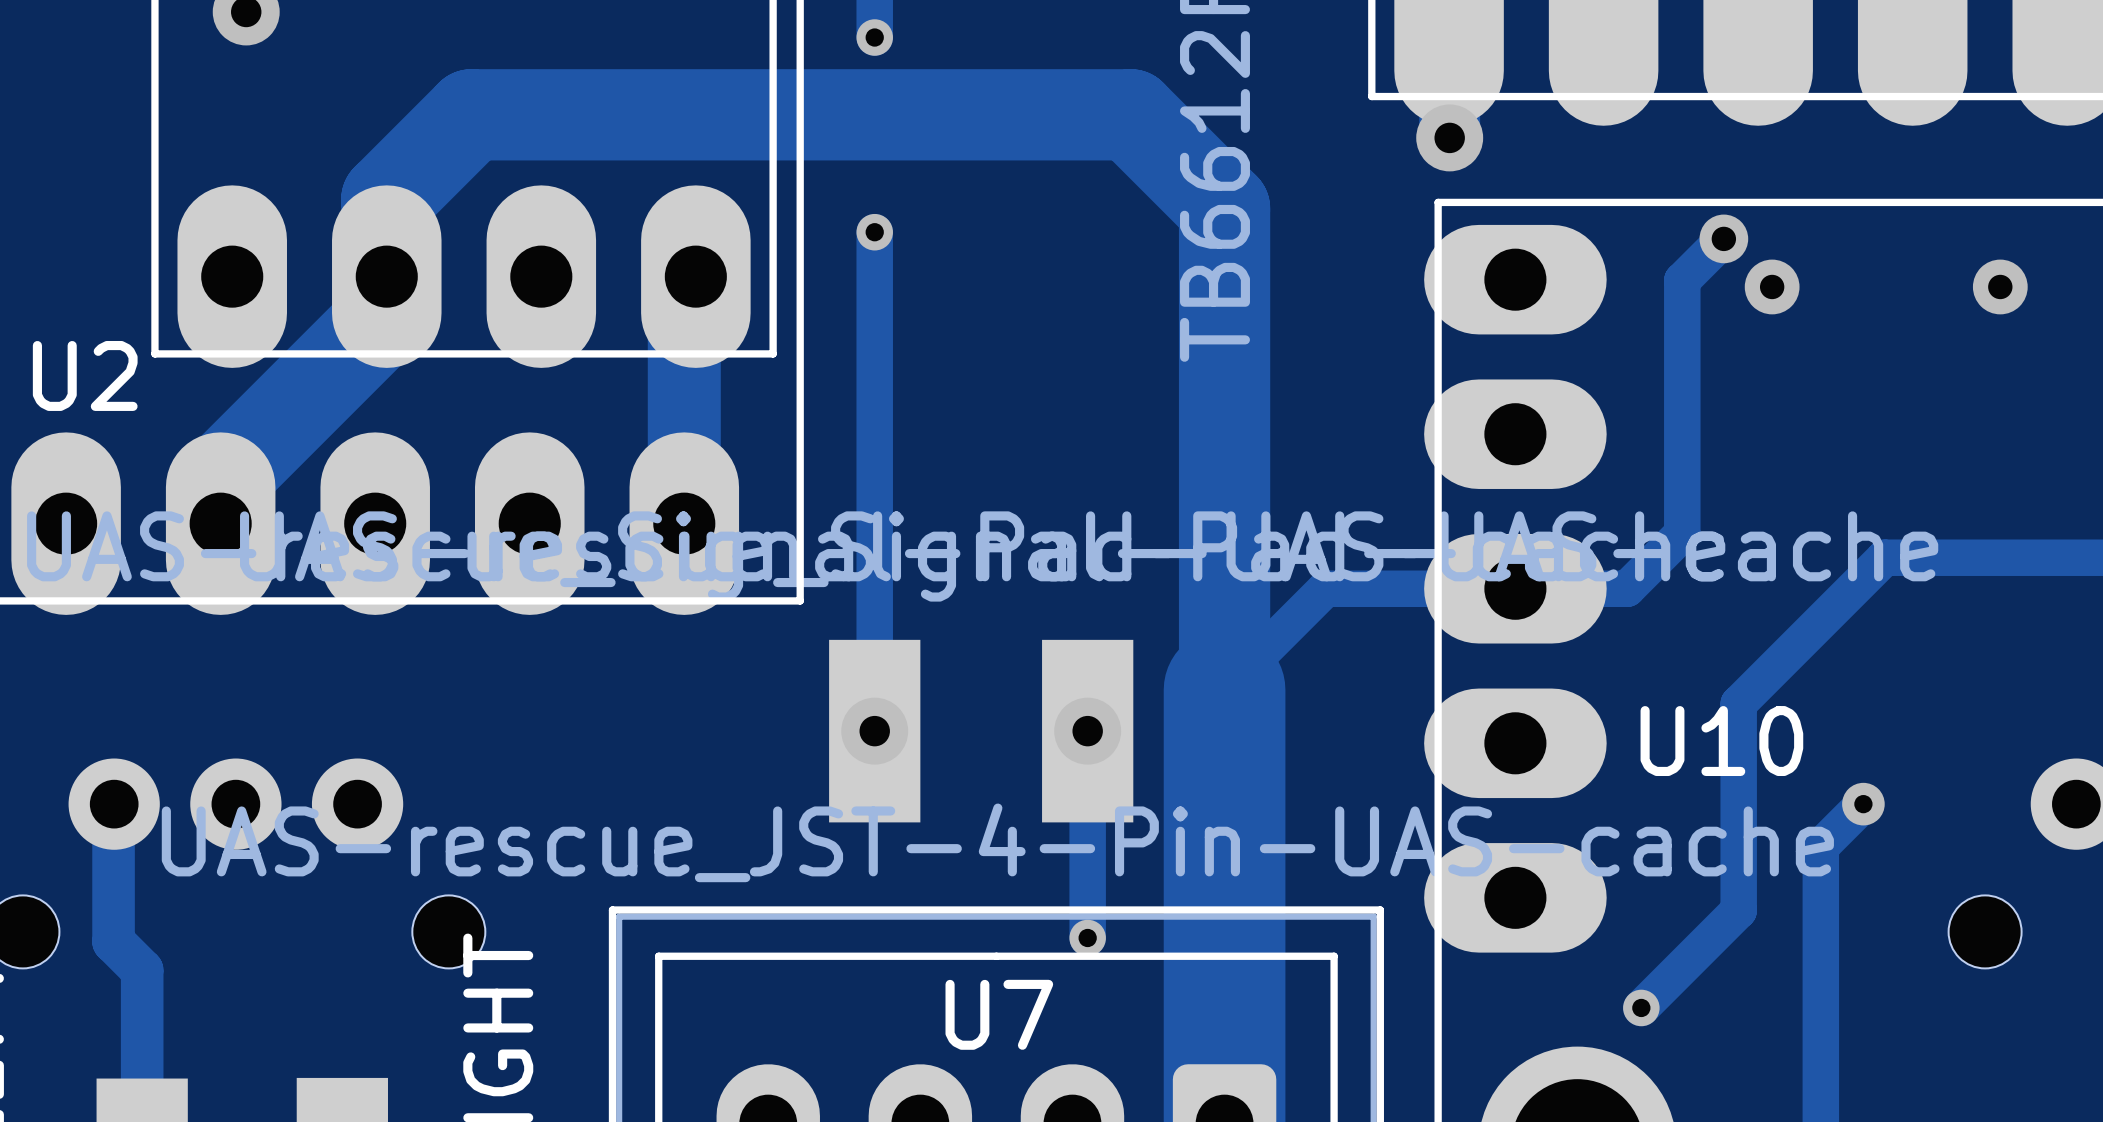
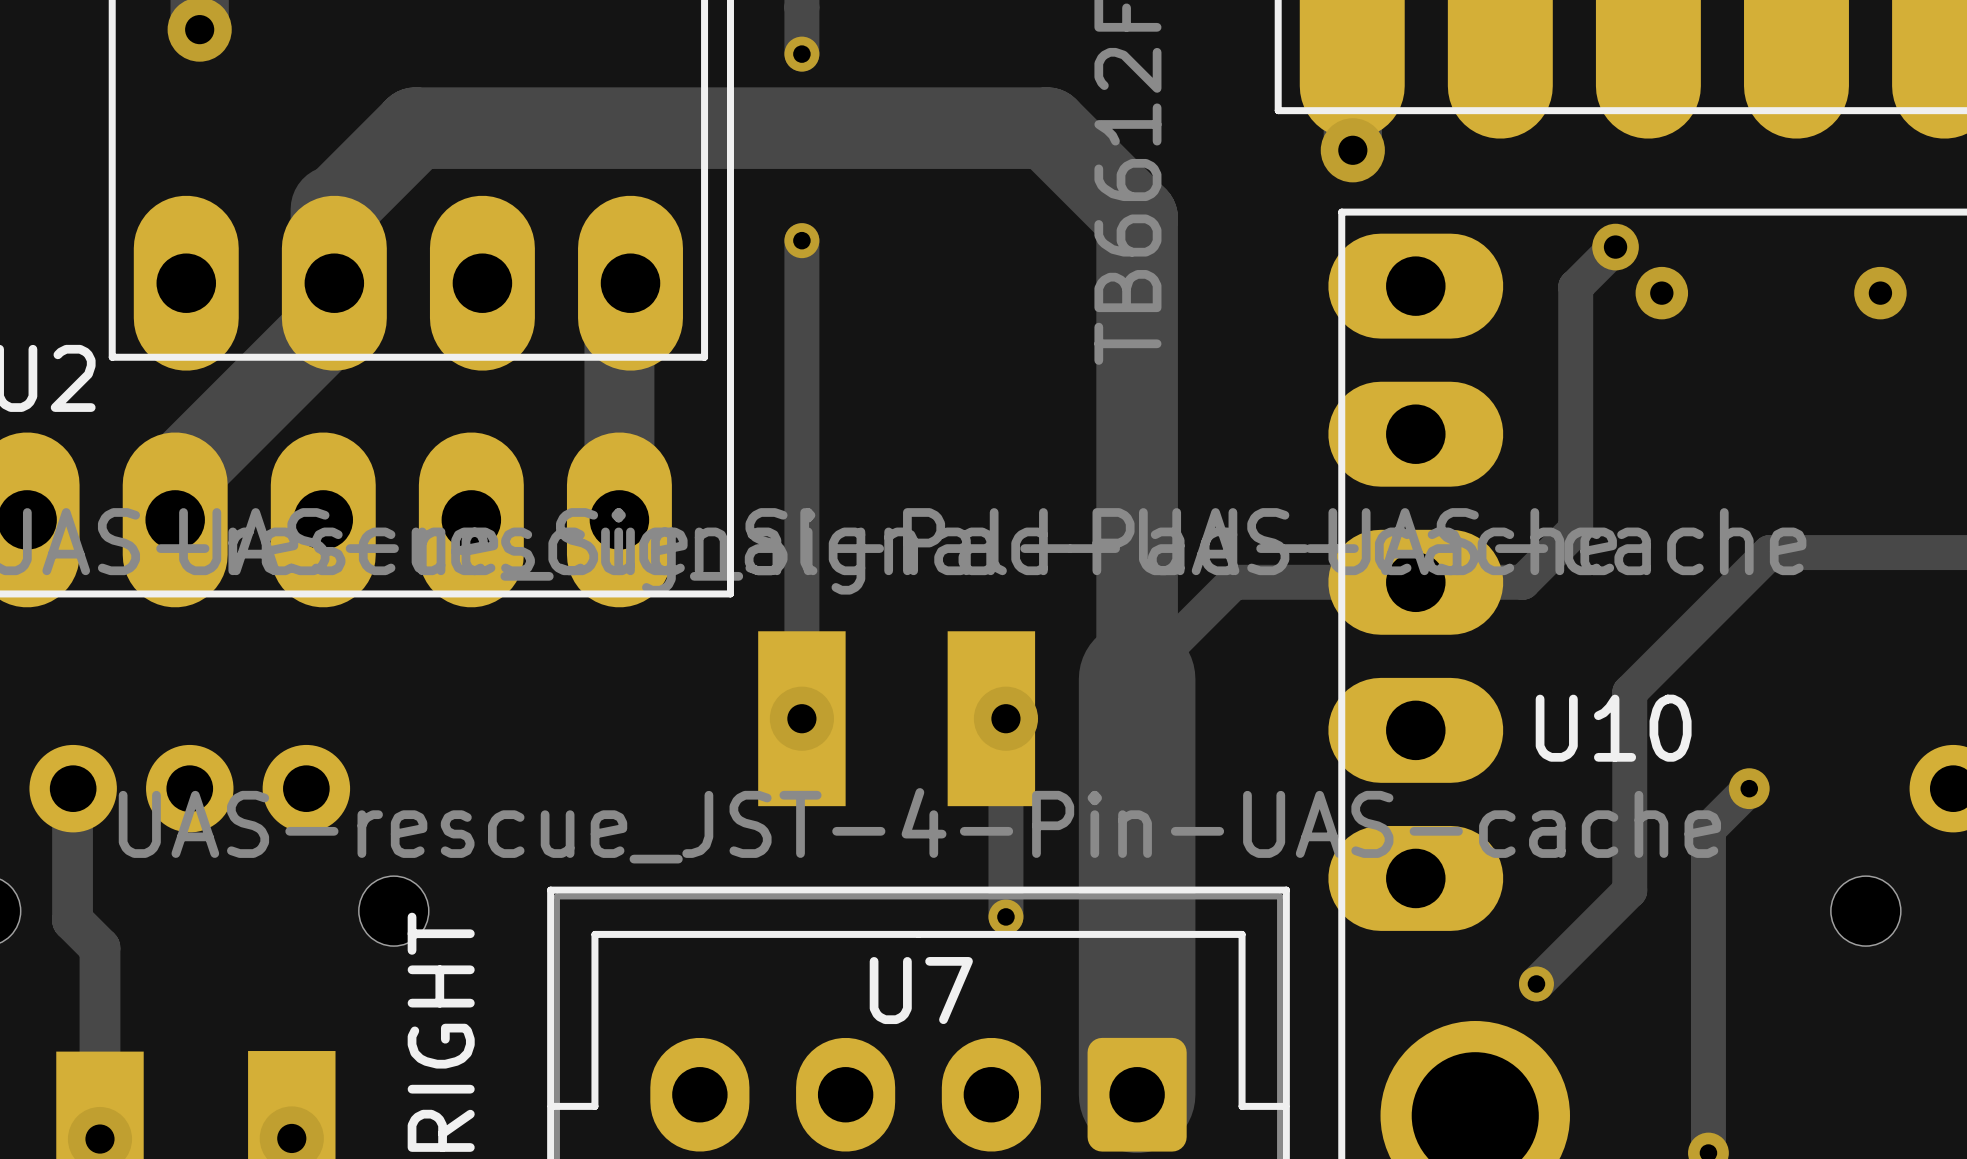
track width: thick (386, 199) (471, 114) (1130, 114) (1224, 208) (1224, 689) -> thin (334, 209) (415, 128) (1047, 128) (1137, 217) (1137, 679)
track width: thick (386, 314) (220, 481) -> thin (334, 319) (175, 479)
part position: (1087, 731) -> (991, 718)

